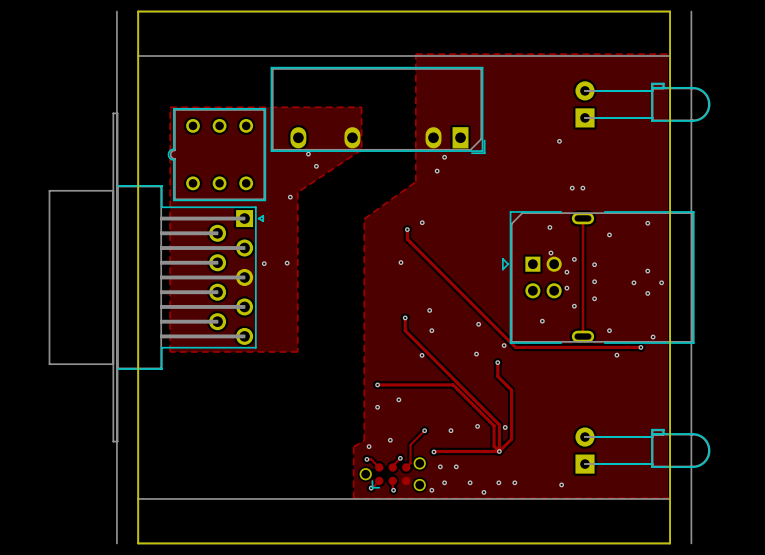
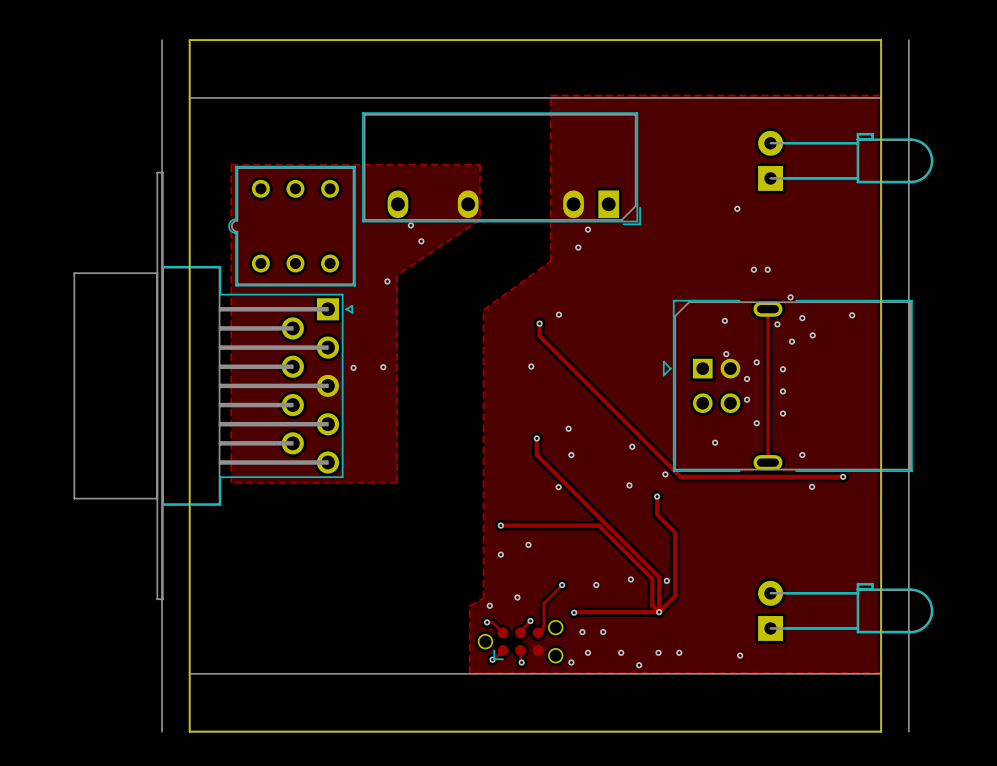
via: none -> (790, 297)
via: none -> (802, 318)
via: none -> (777, 324)
via: (609, 234) -> none
via: none -> (812, 335)
via: none -> (791, 341)
via: (647, 271) -> none
via: (633, 282) -> none
via: (661, 282) -> none
via: (647, 293) -> none
via: (653, 337) -> none

